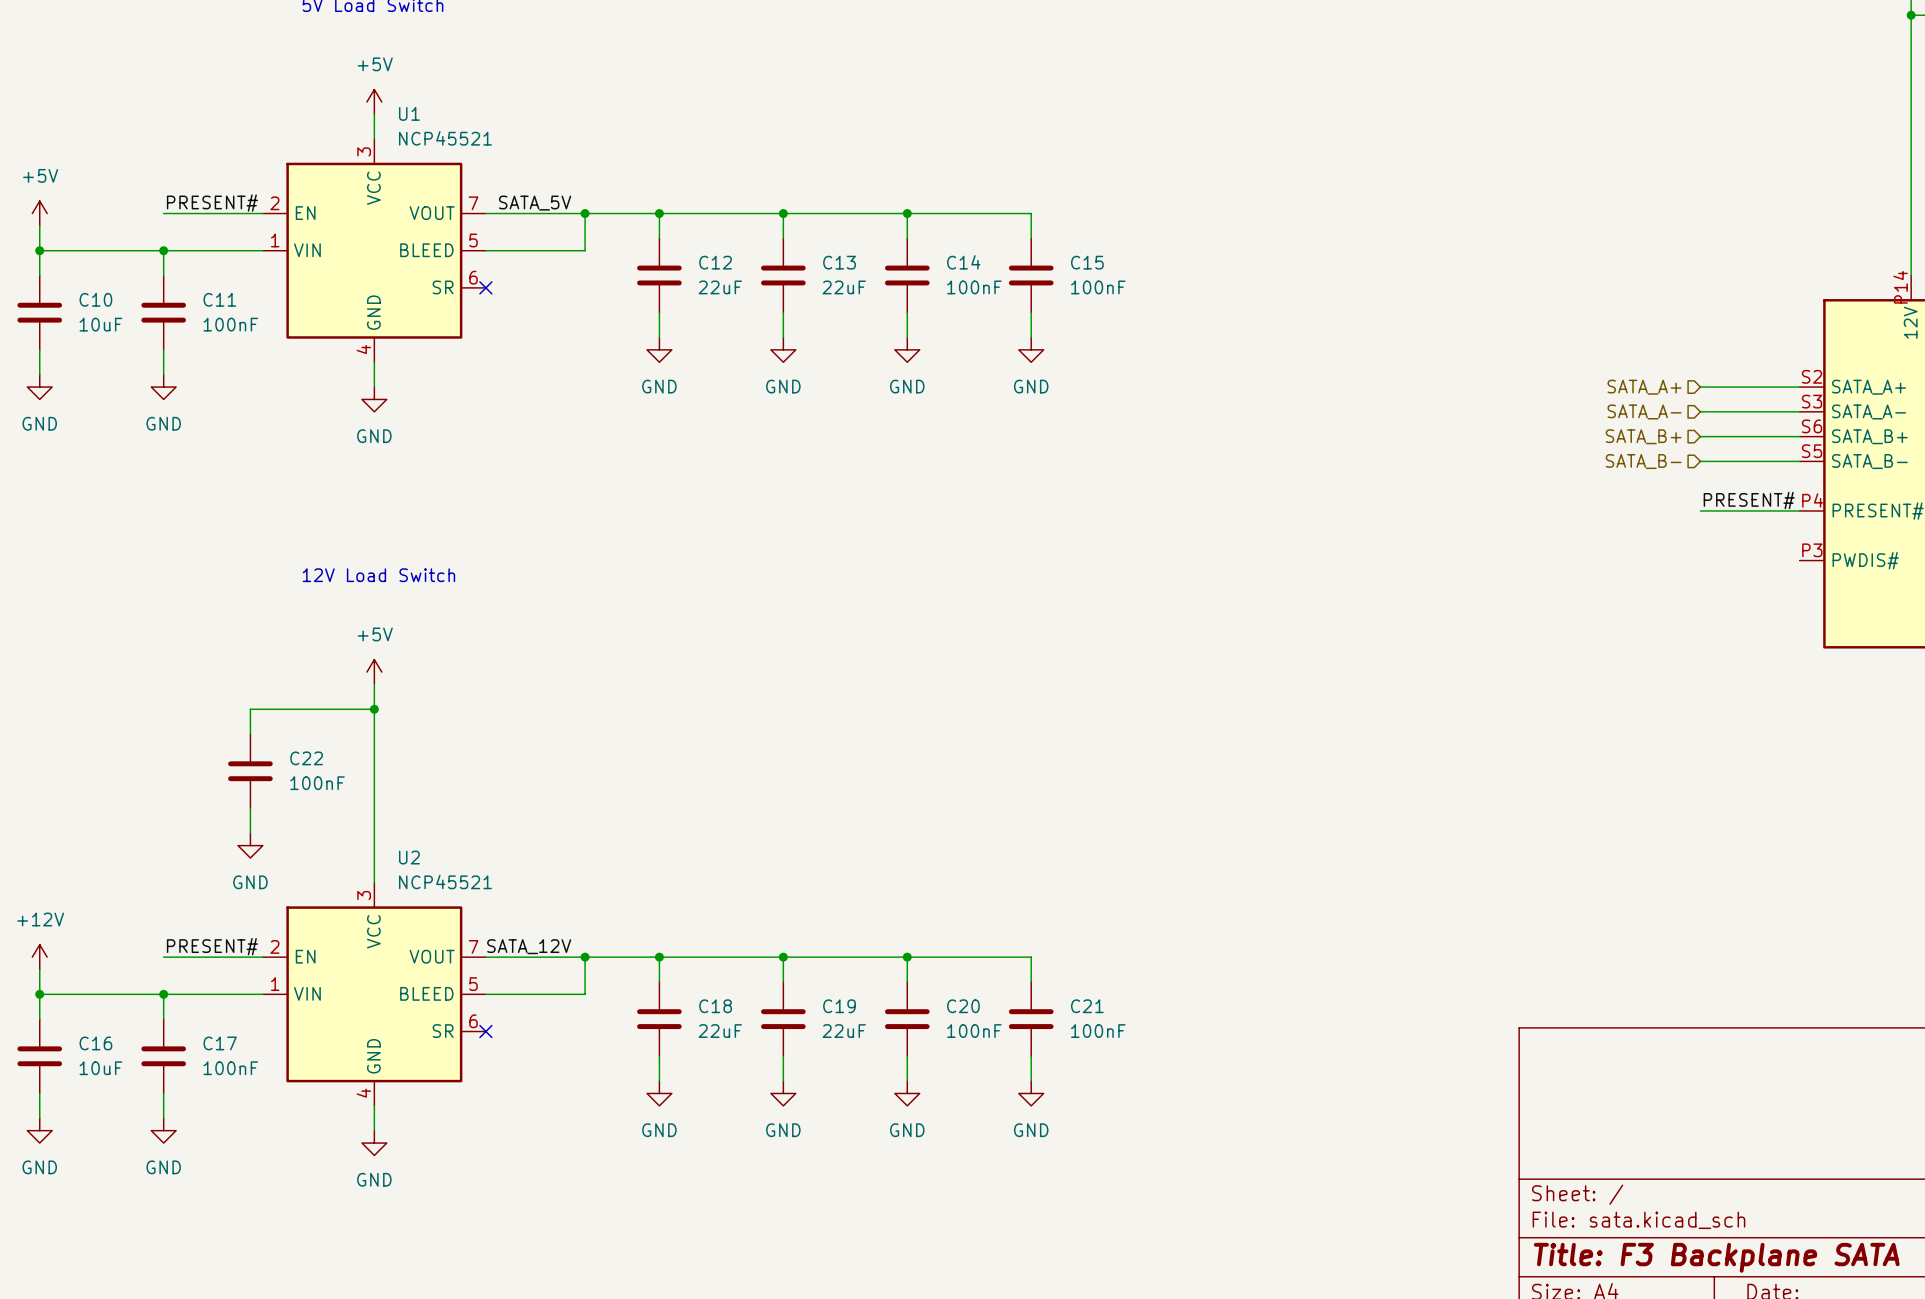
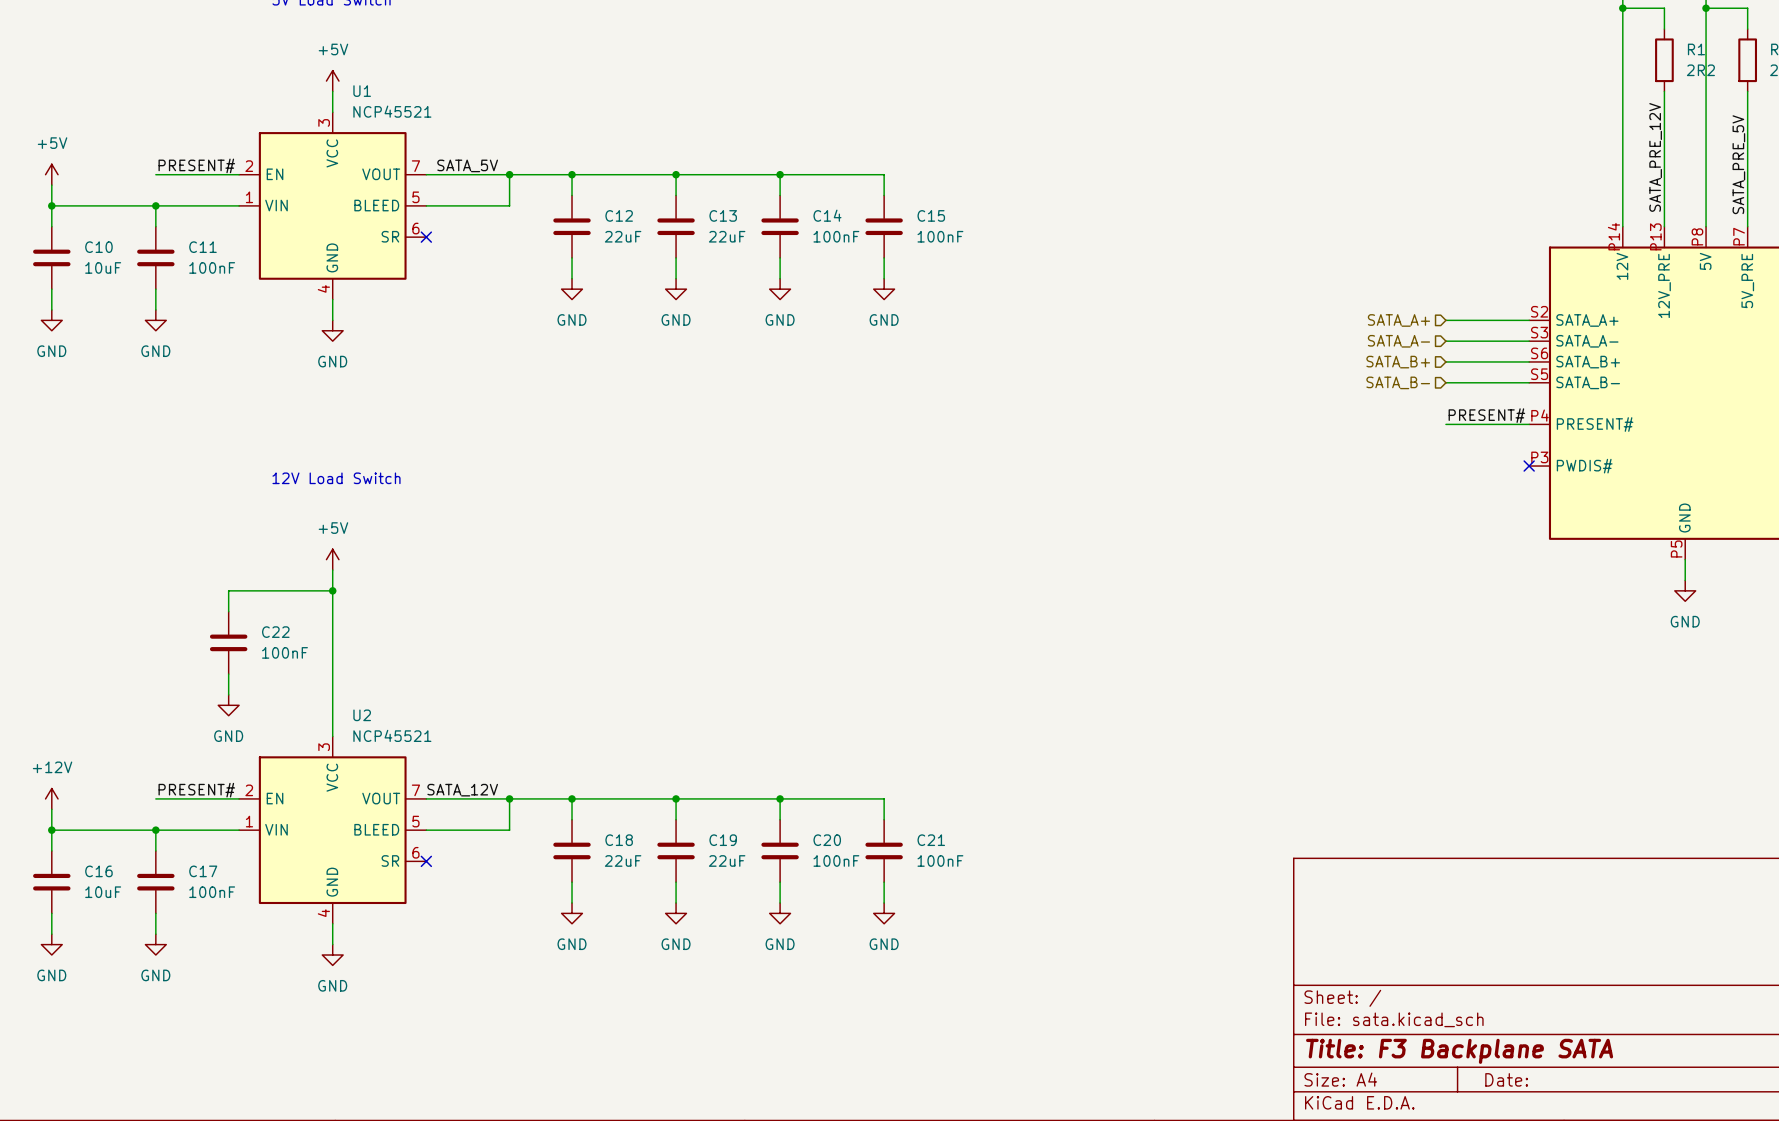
no-connect mark: none -> (1529, 466)

